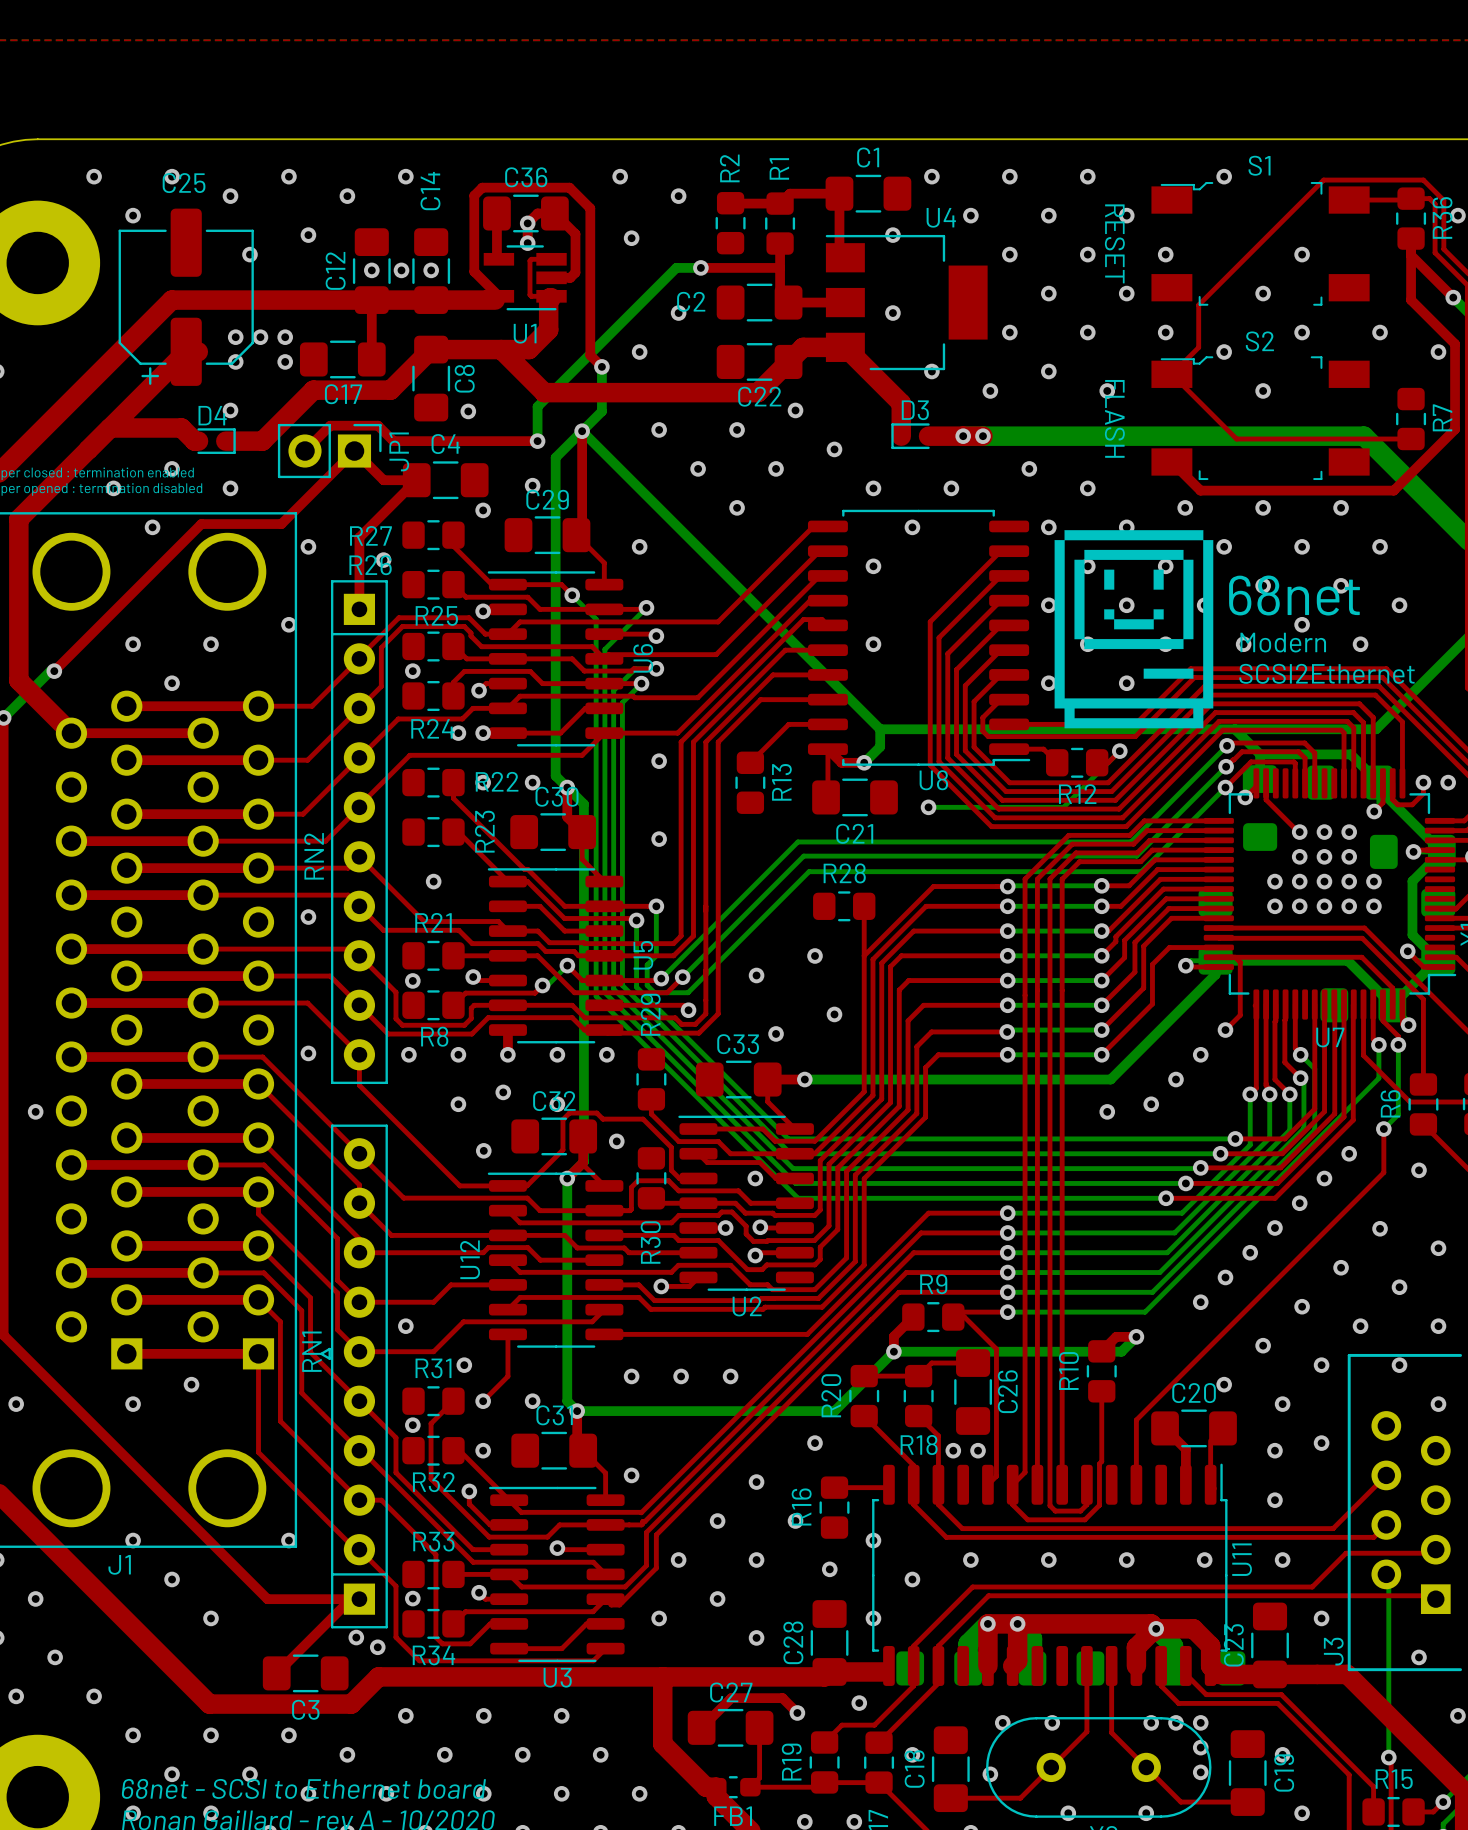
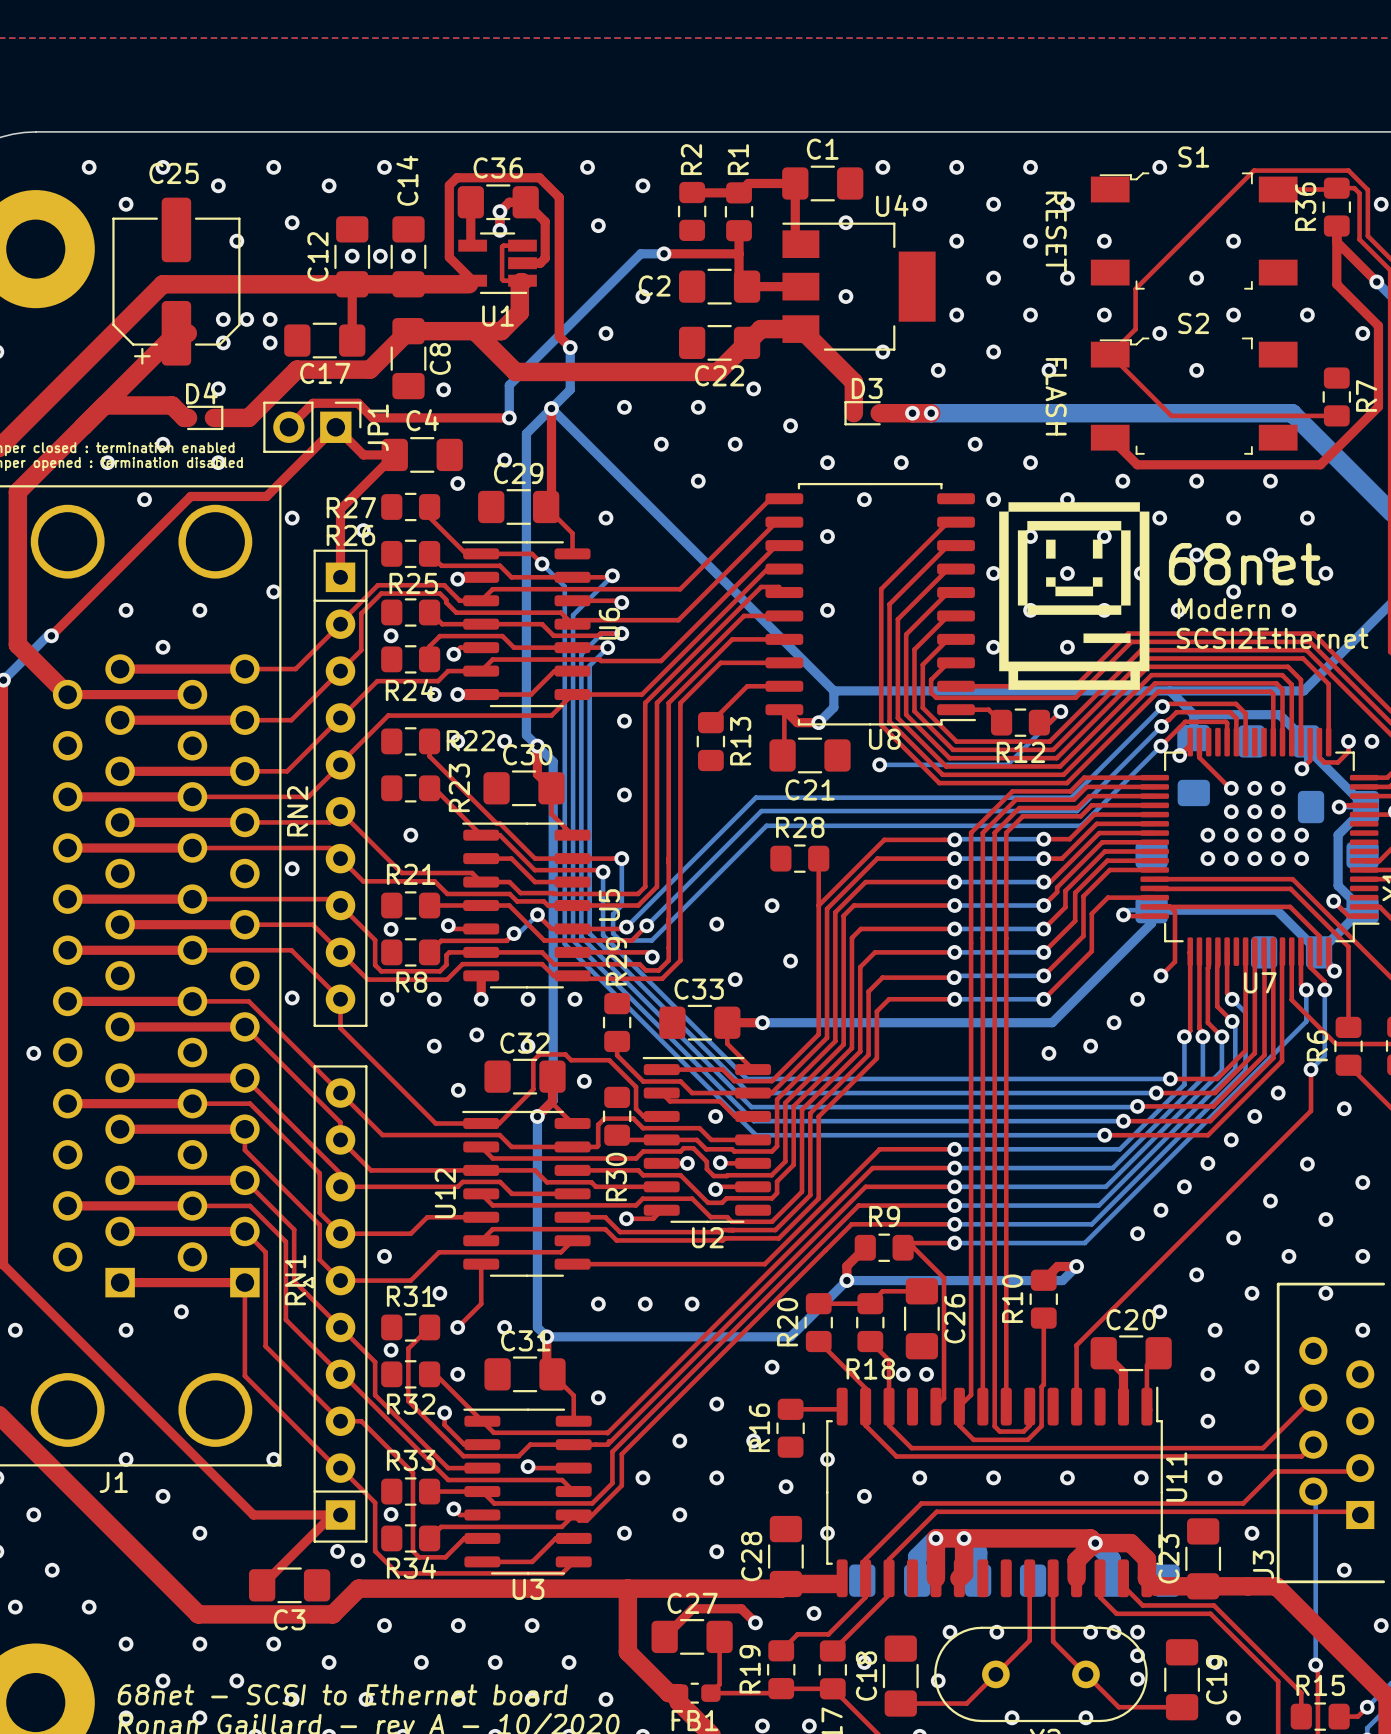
R36 name position: R36 (1442, 217) -> R36 (1305, 206)

